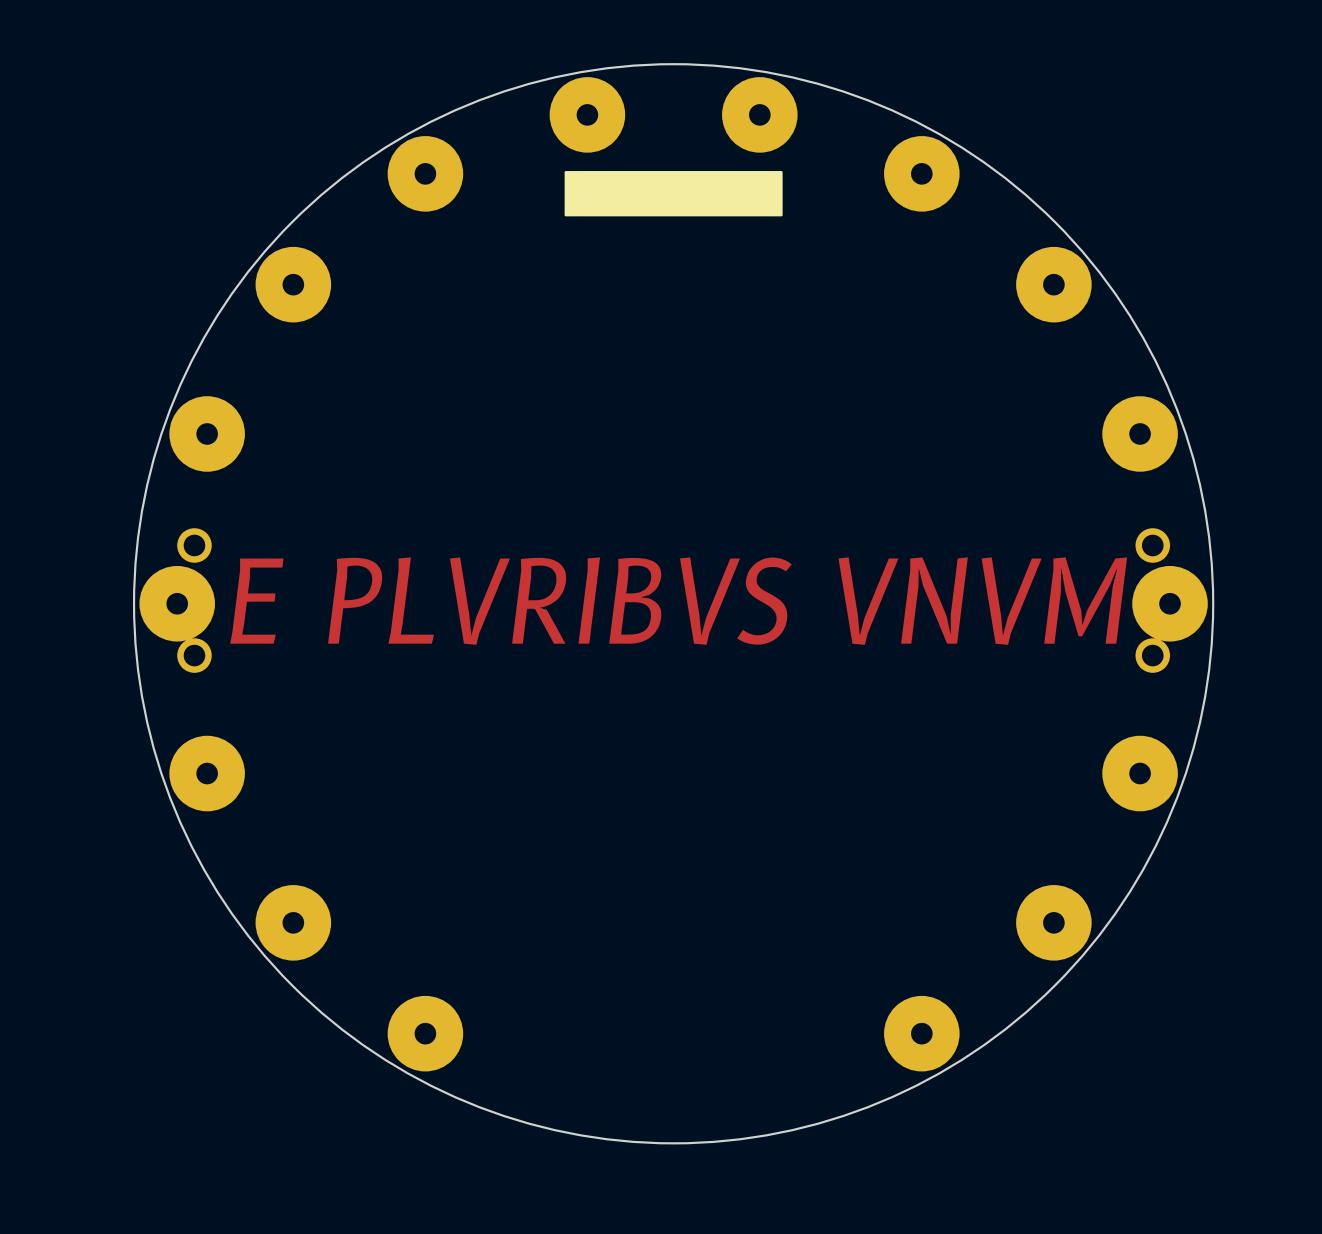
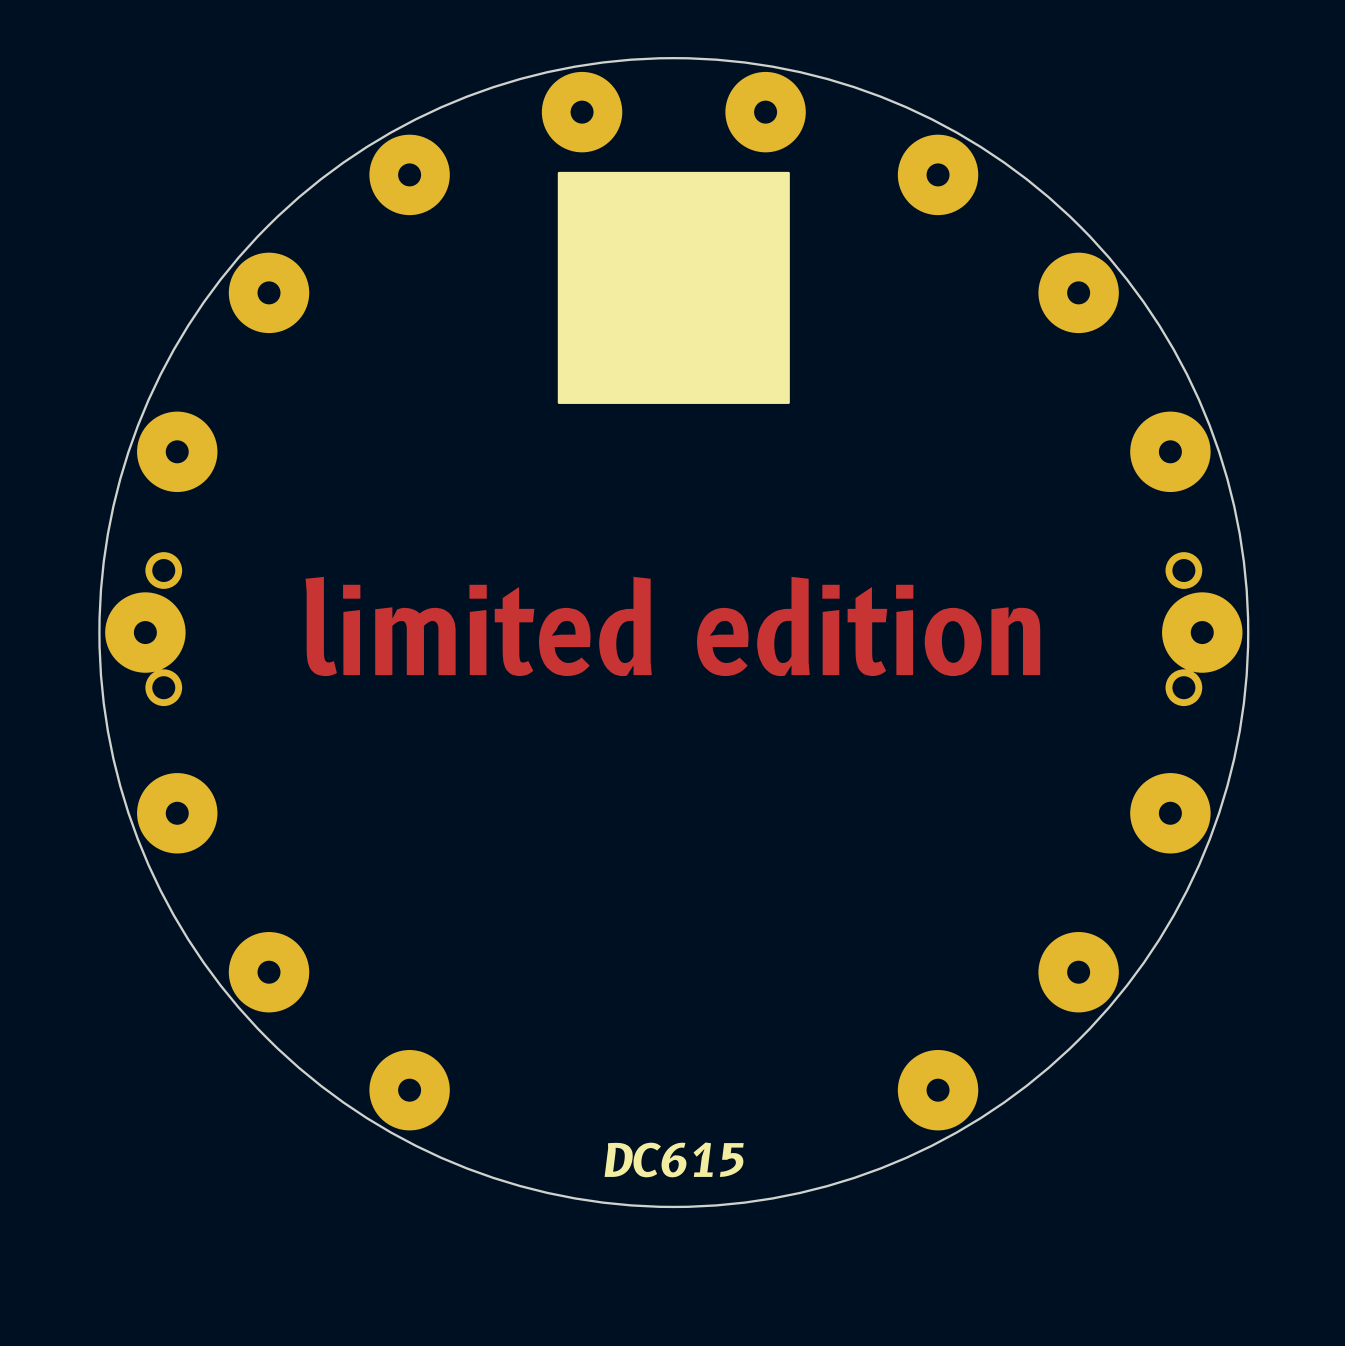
drawing: [564, 171, 783, 217] -> none
drawing: none -> [557, 171, 790, 404]
text: E PLVRIBVS VNVM (678, 601) -> limited edition (672, 626)
text: none -> DC615 (674, 1159)

